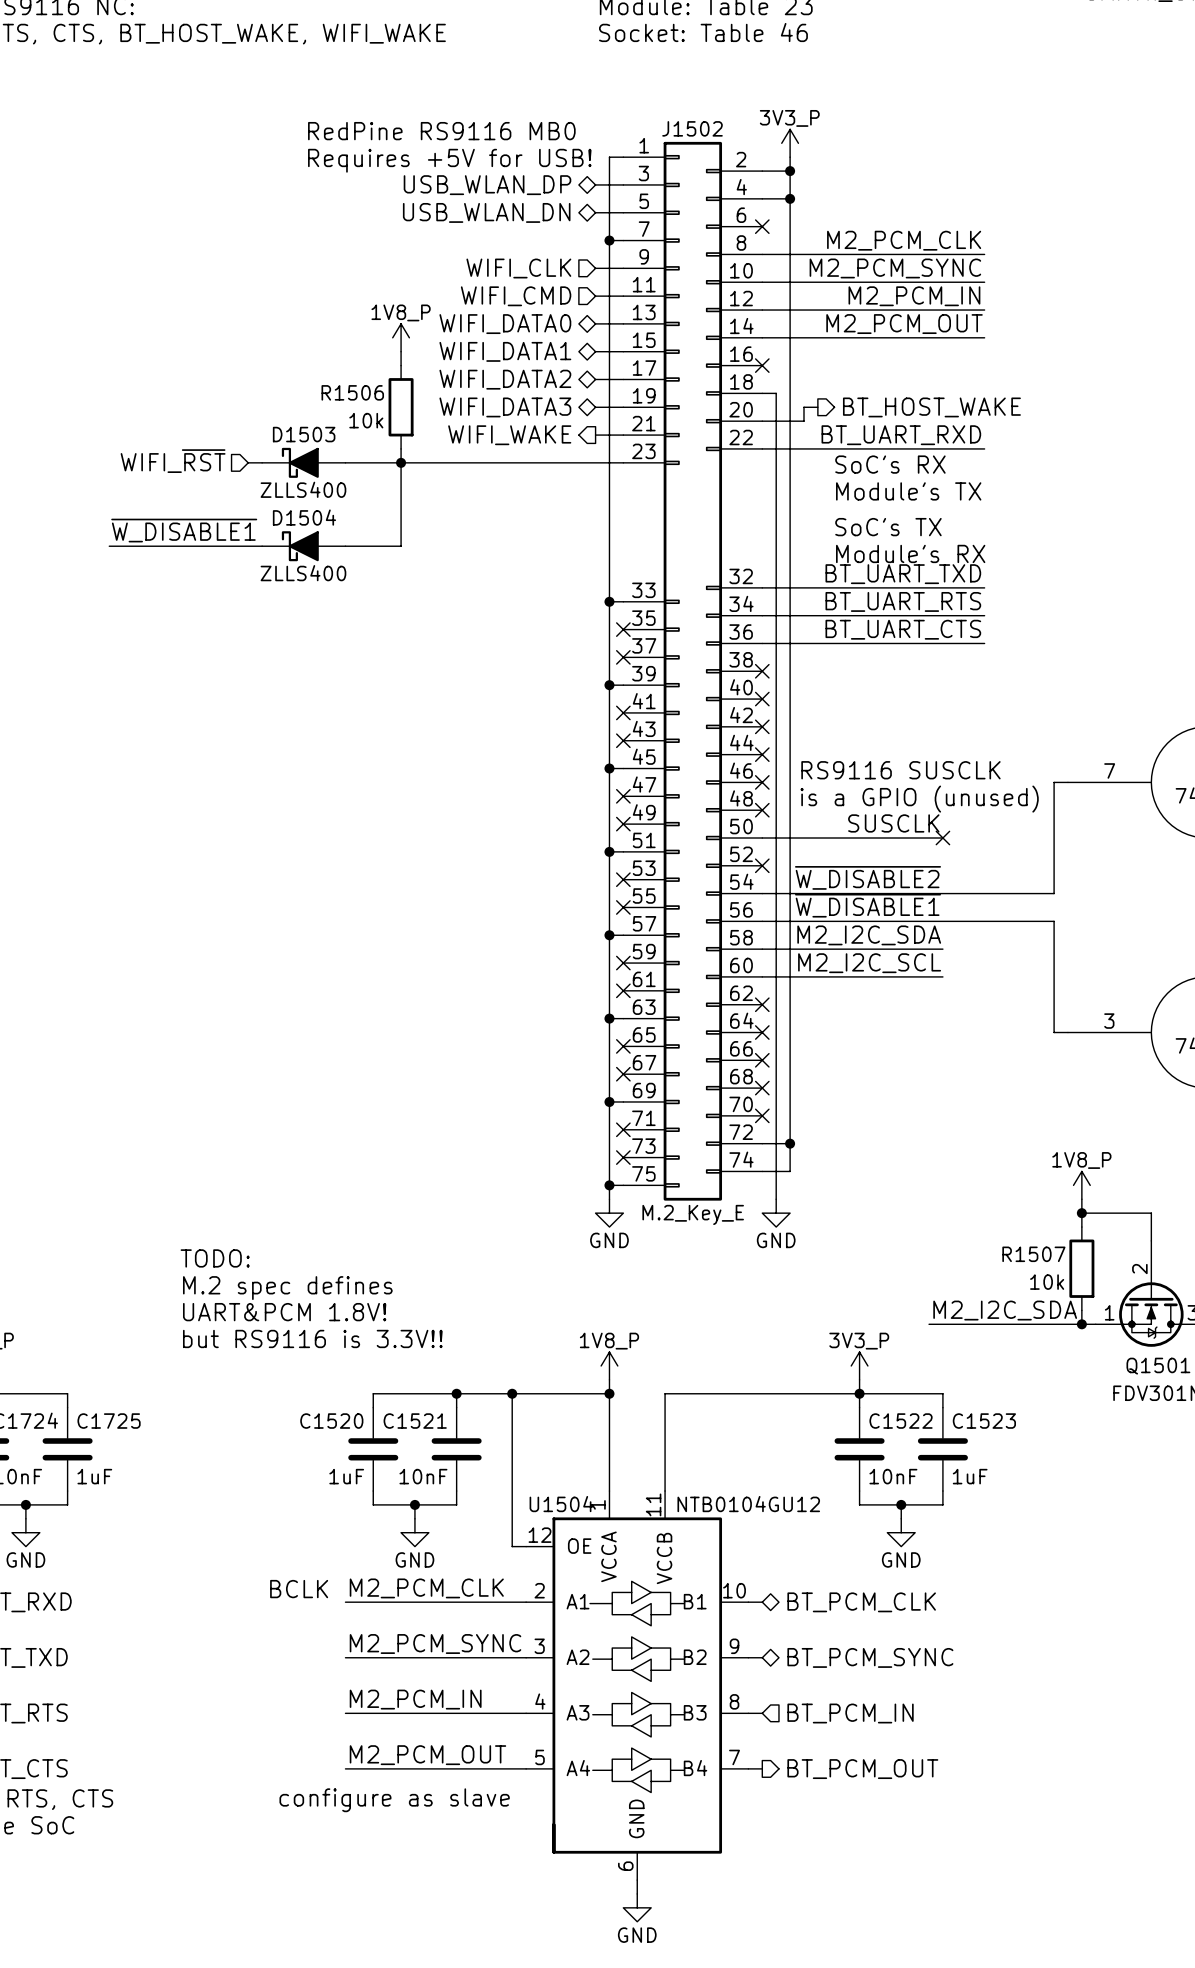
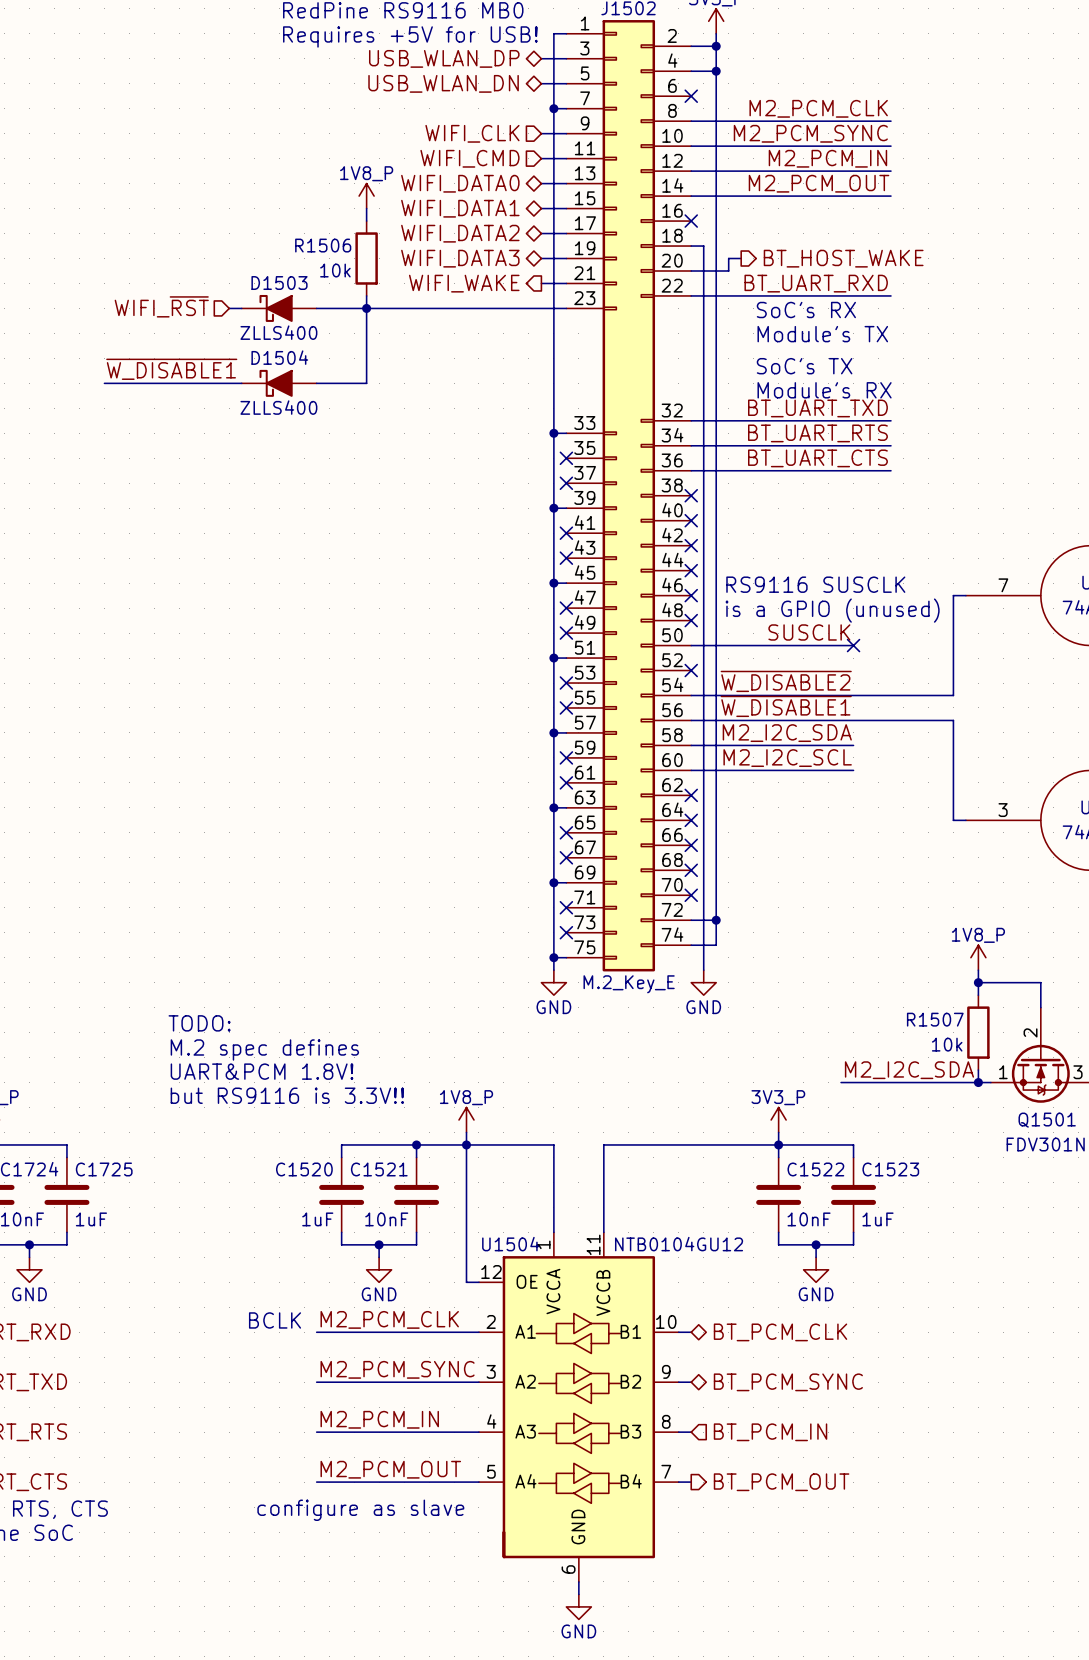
power symbol position: 1V8_P (609, 1365) -> 1V8_P (466, 1120)
wire: (609, 1379) (609, 1393) -> (466, 1132) (466, 1144)
junction: (609, 1393) -> none

